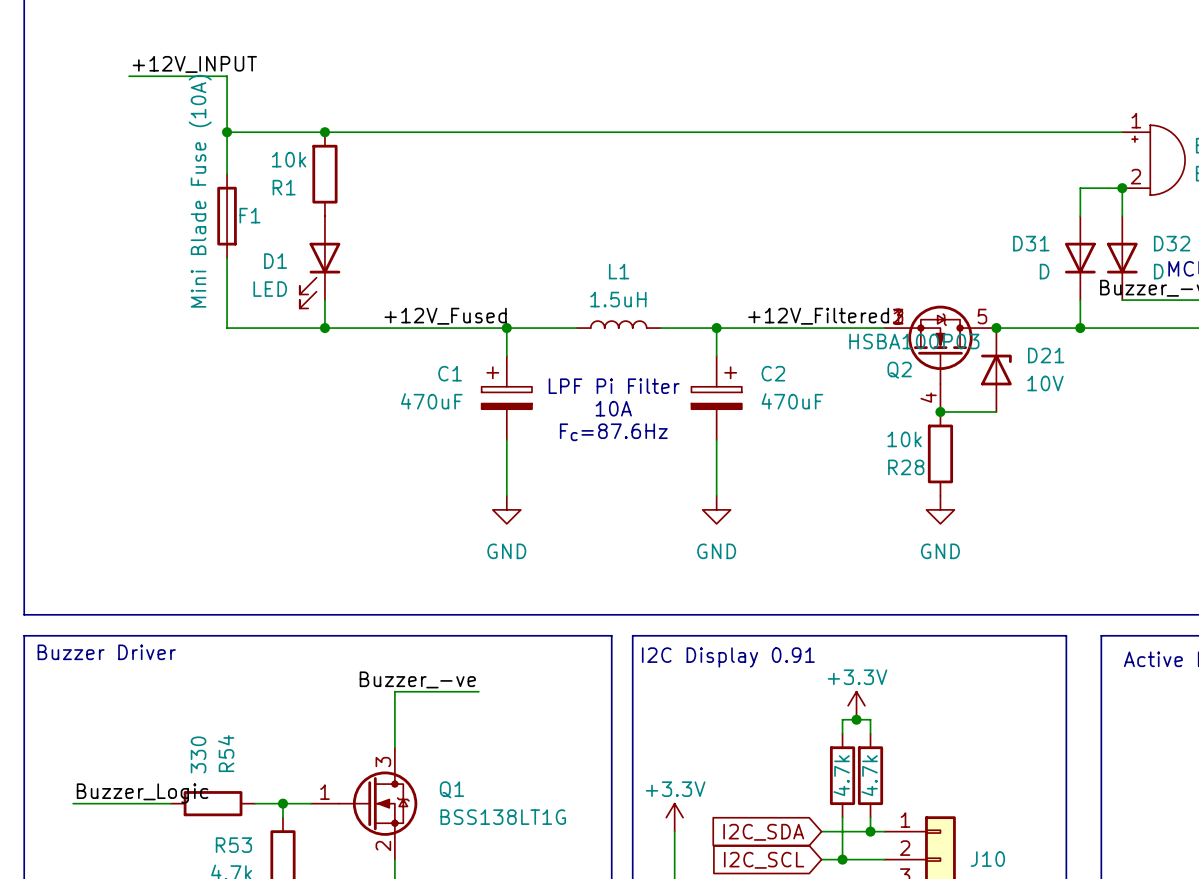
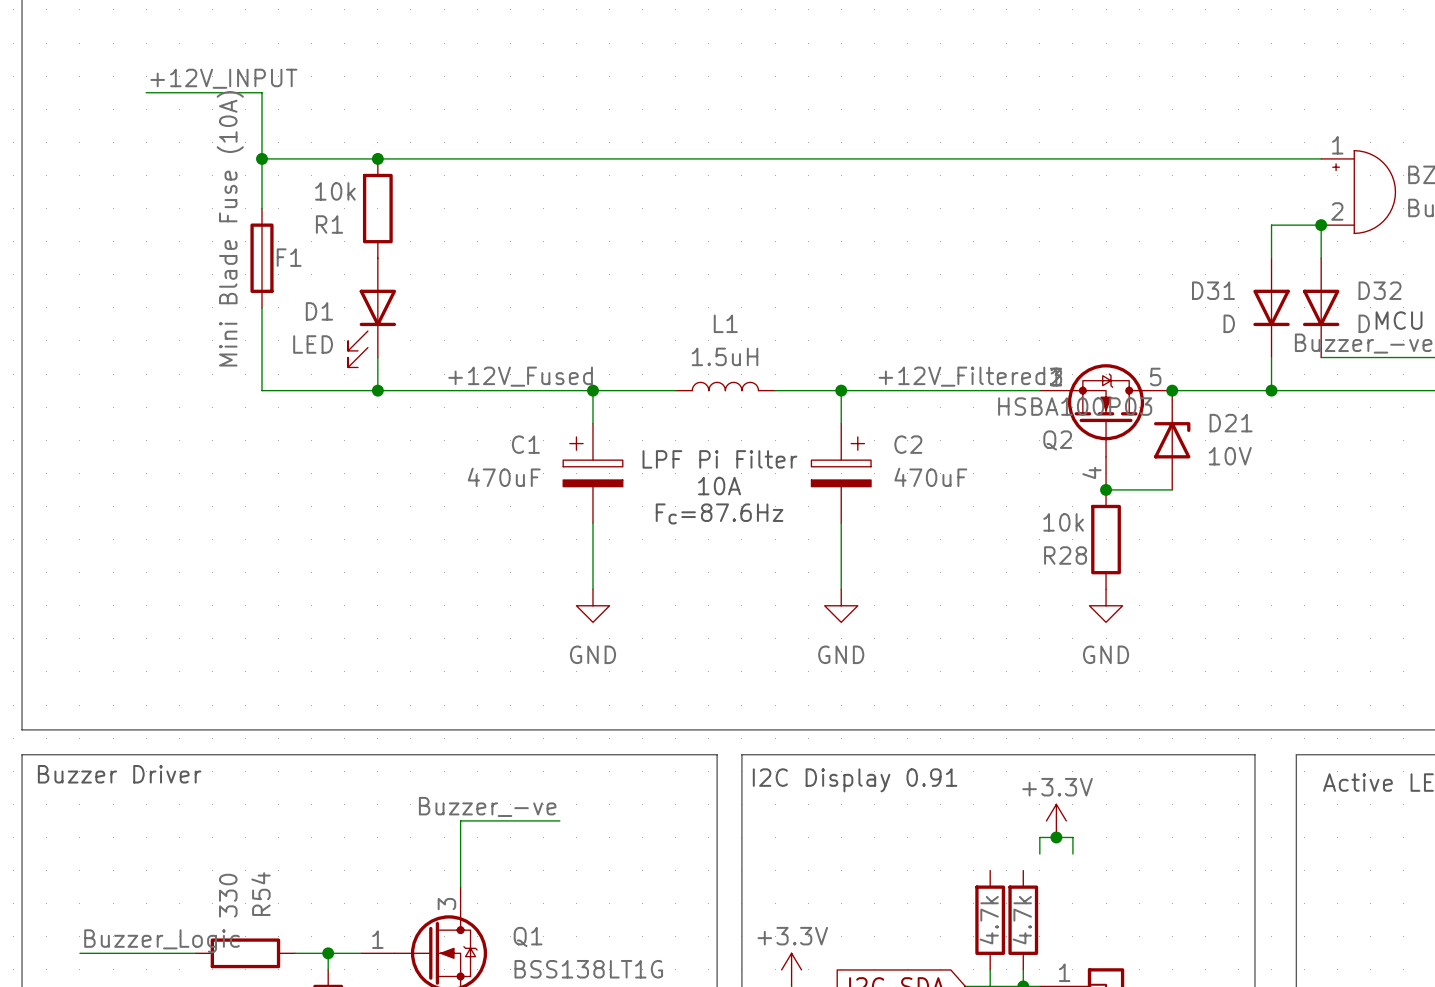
power symbol position: +3.3V (856, 705) -> +3.3V (1056, 820)
junction position: (856, 719) -> (1056, 837)
wire: (842, 733) (842, 719) (870, 719) (870, 733) -> (1039, 854) (1039, 837) (1072, 837) (1072, 854)

